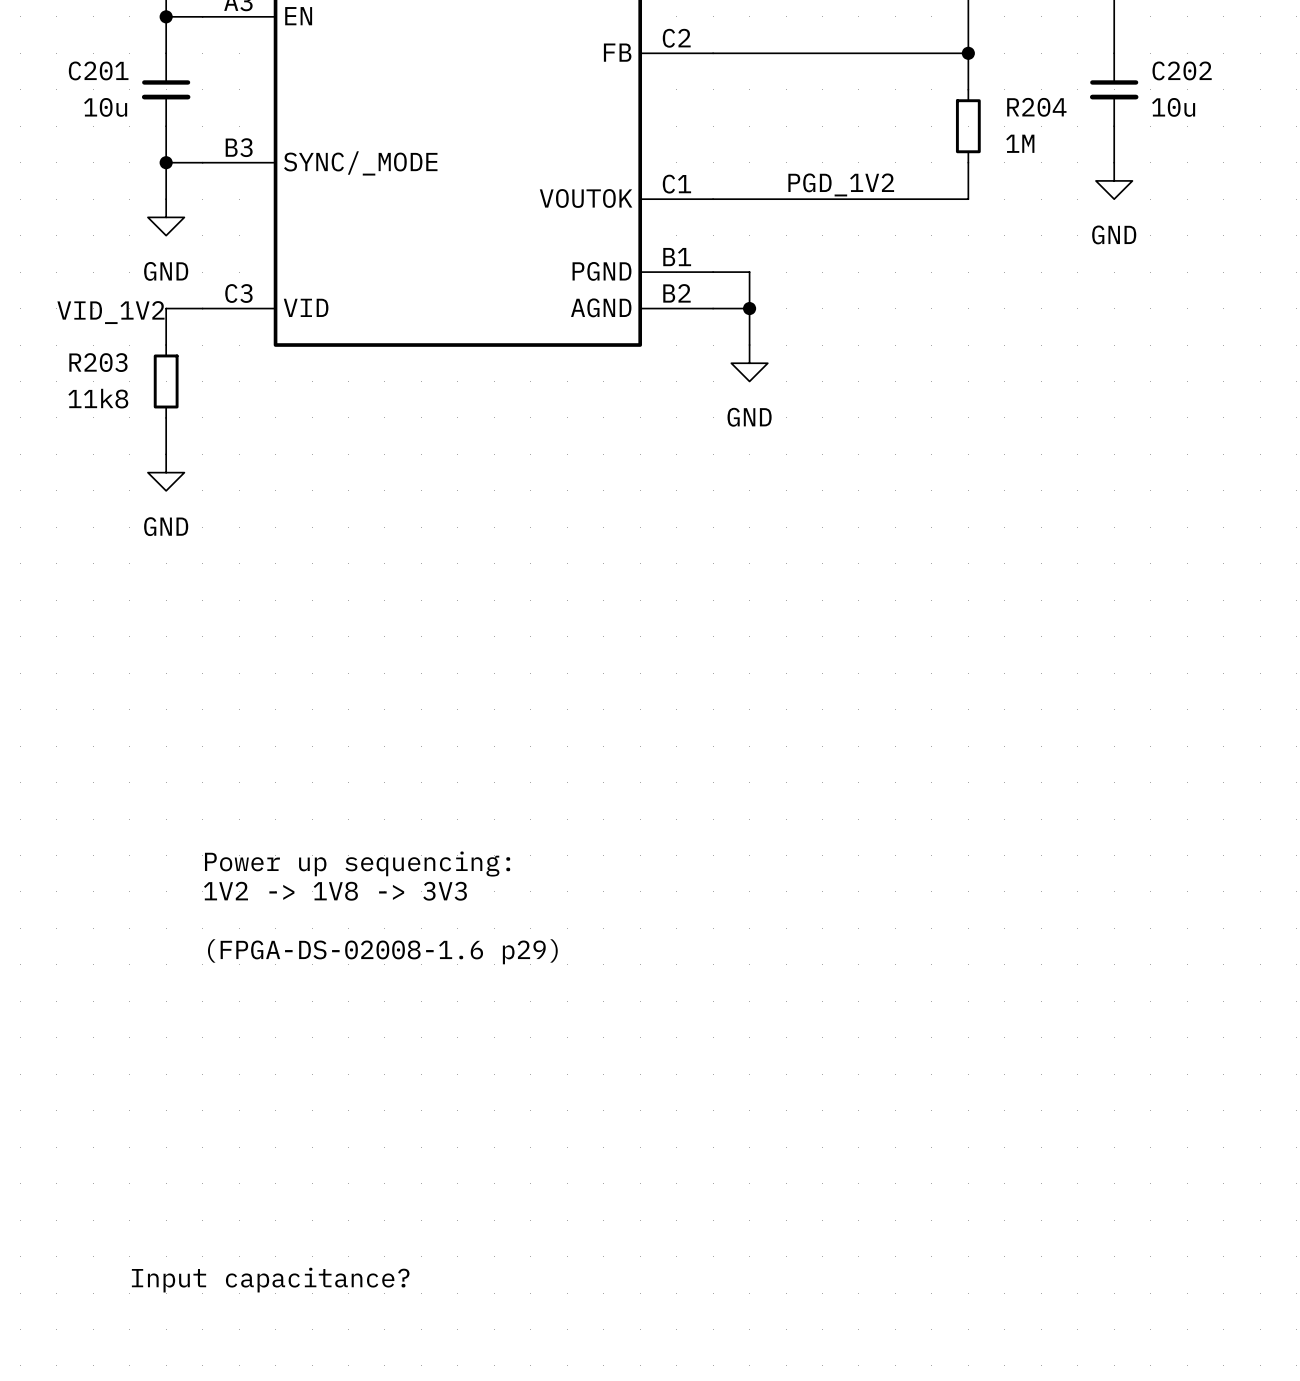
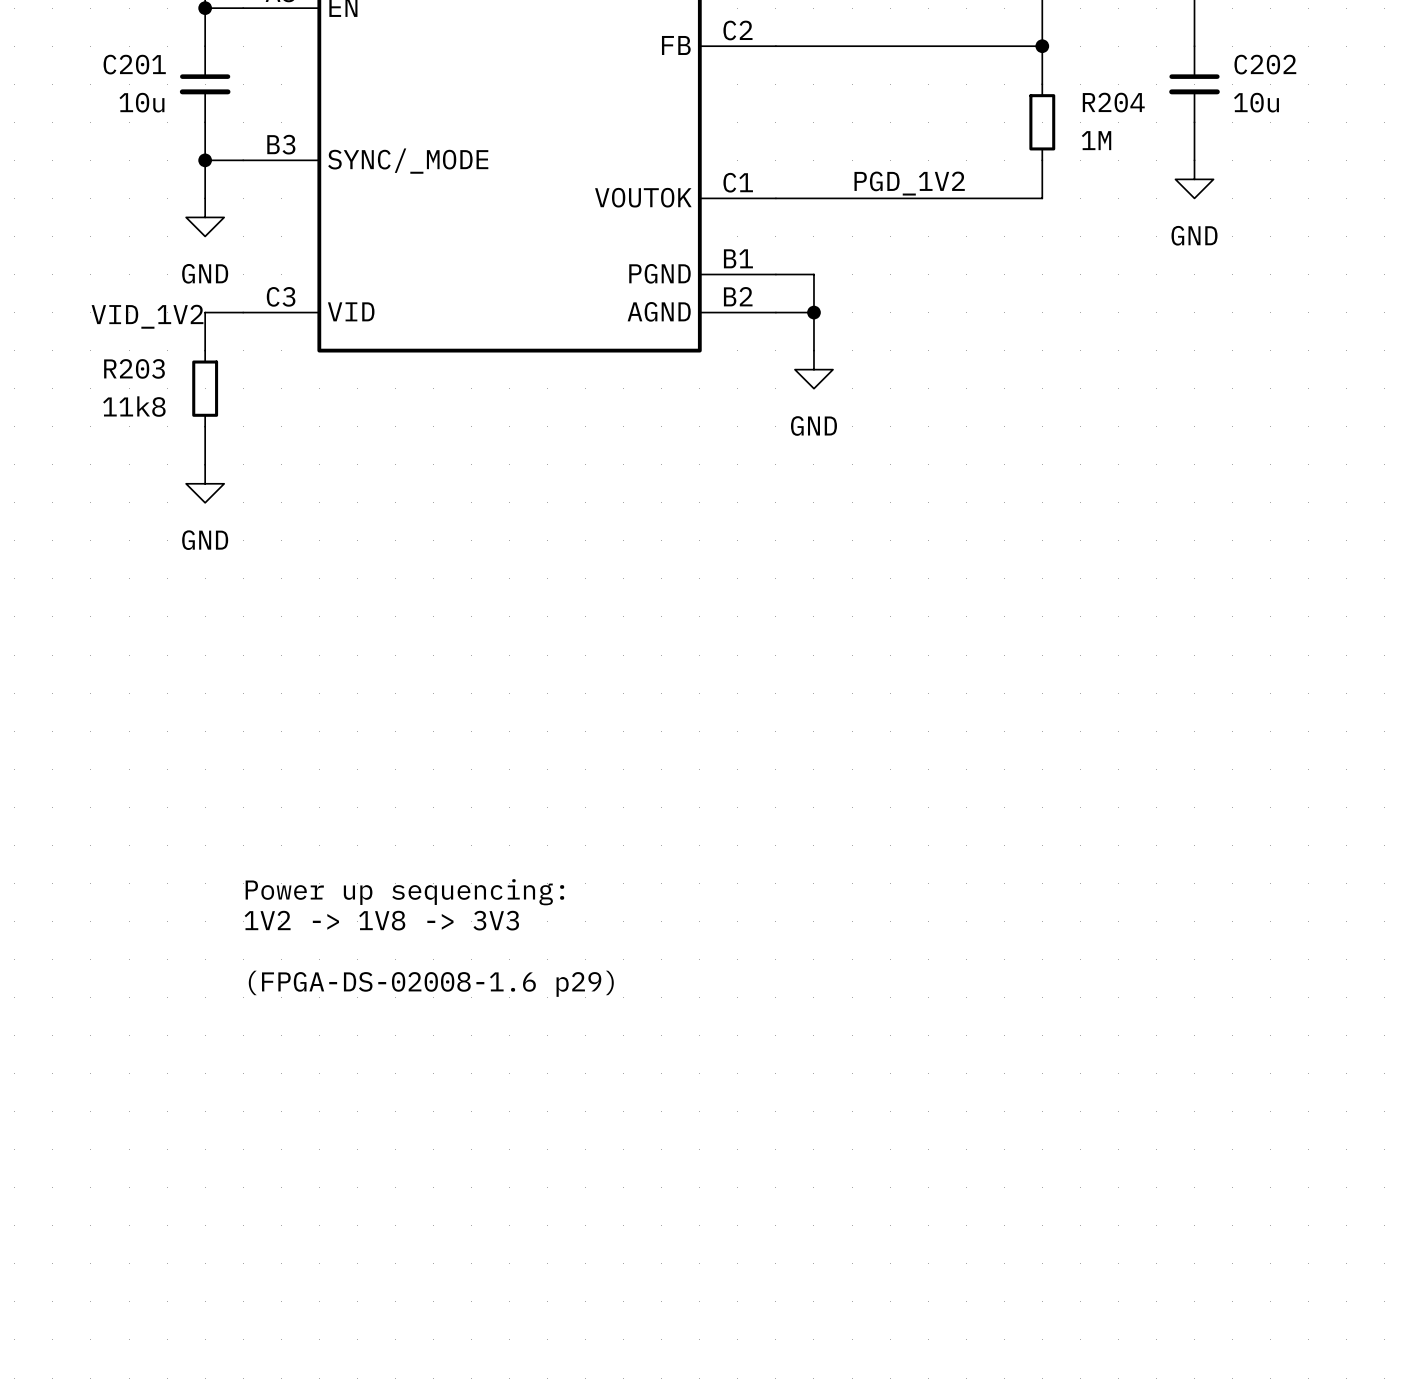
text: Input capacitance? (270, 1280) -> none

